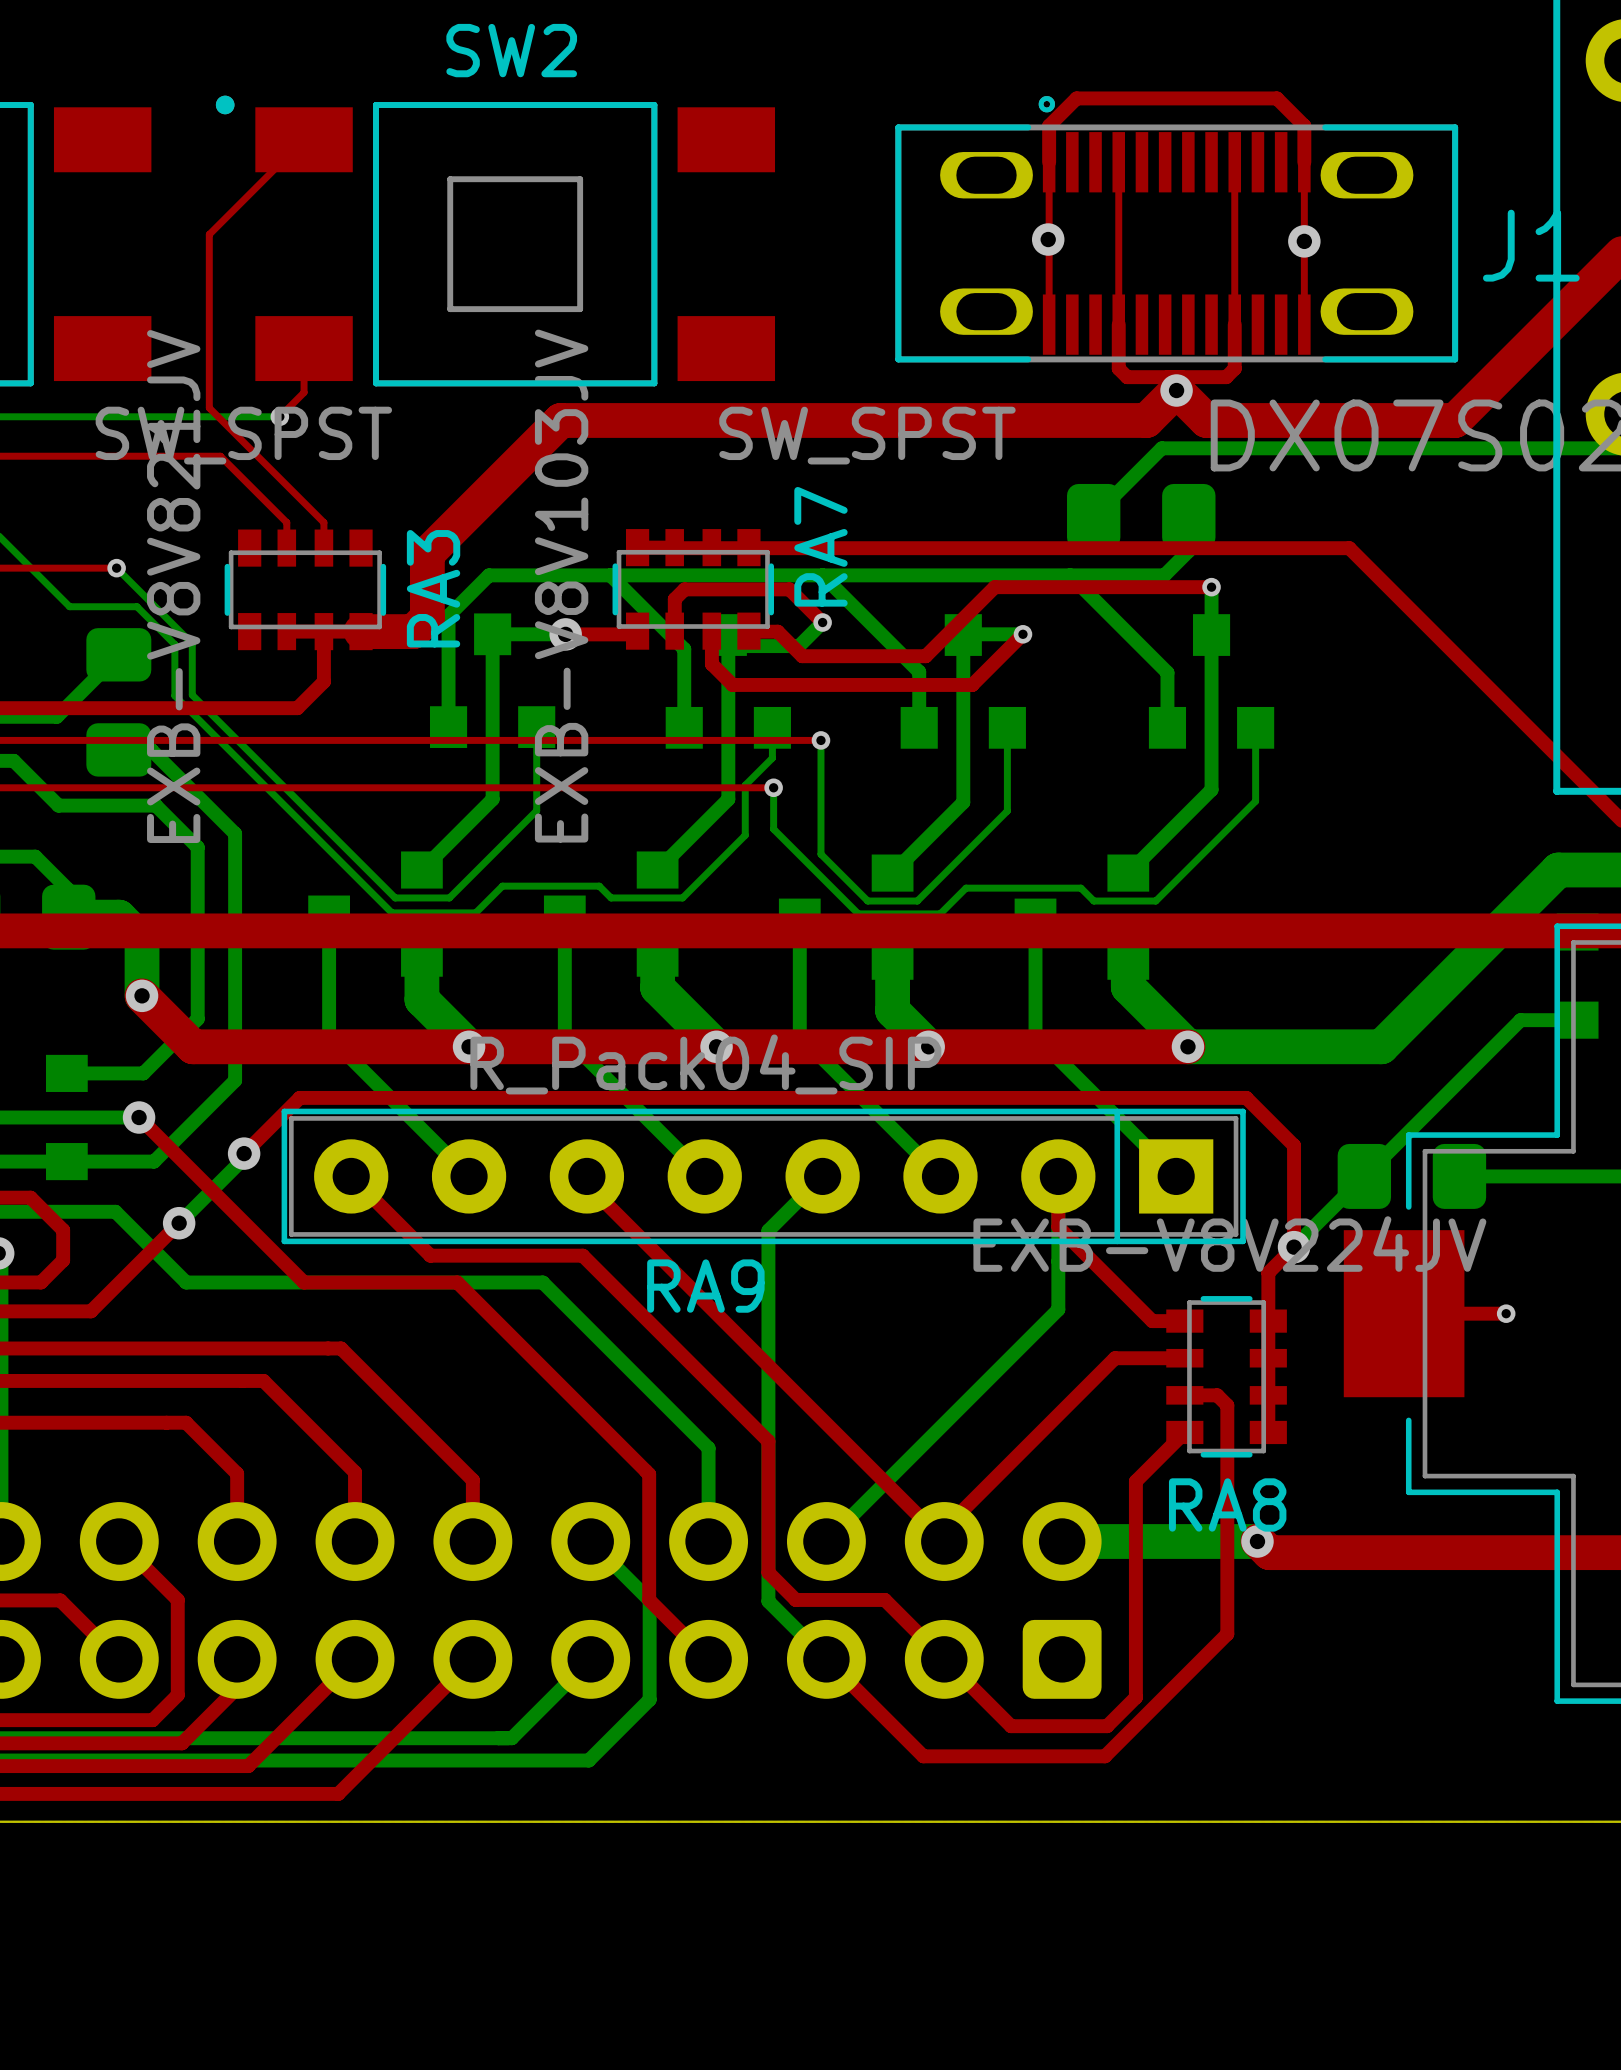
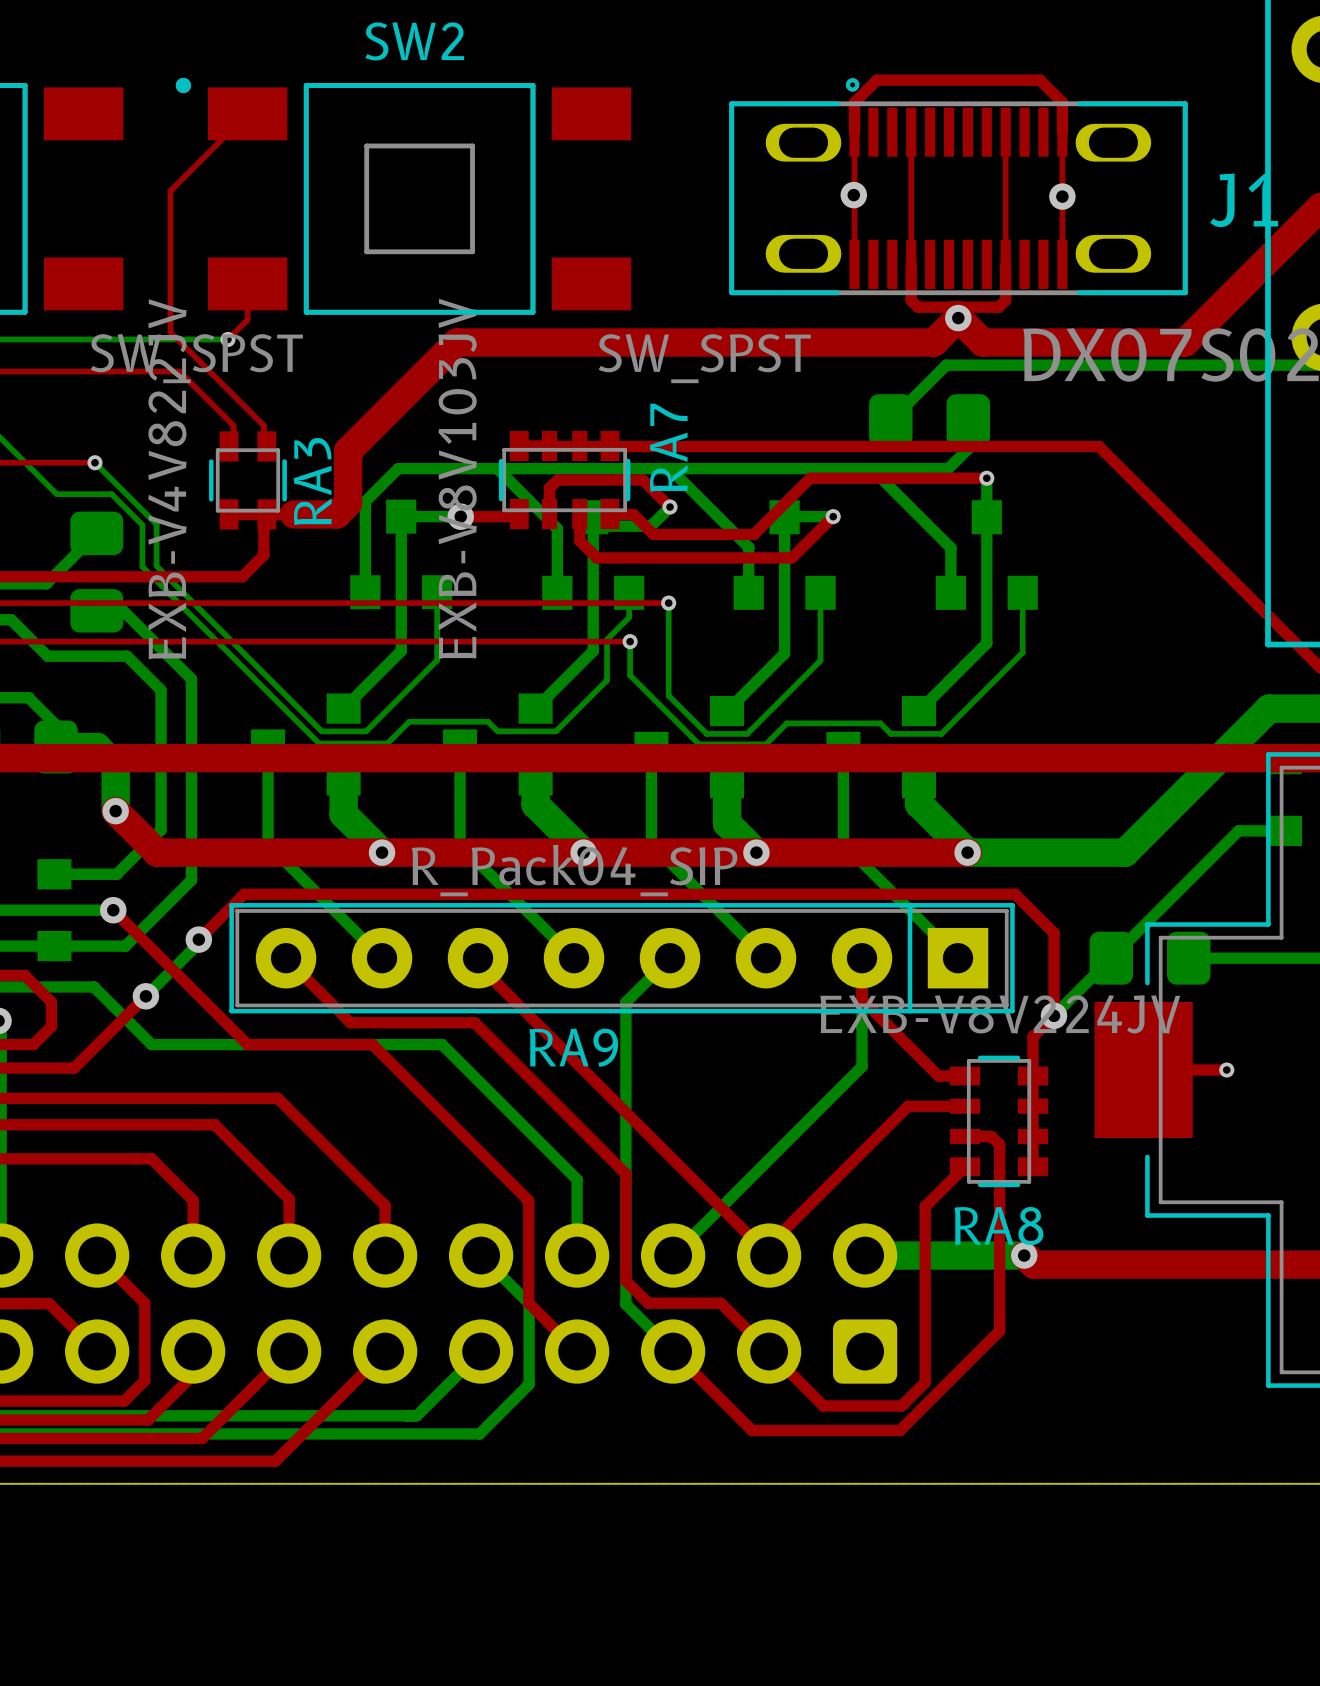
RA3 footprint: [224, 529, 387, 651] -> [209, 431, 287, 530]
RA3 value: EXB-V8V821JV (173, 586) -> EXB-V4V822JV (167, 479)
RA3 name position: RA3 (433, 588) -> RA3 (312, 481)

